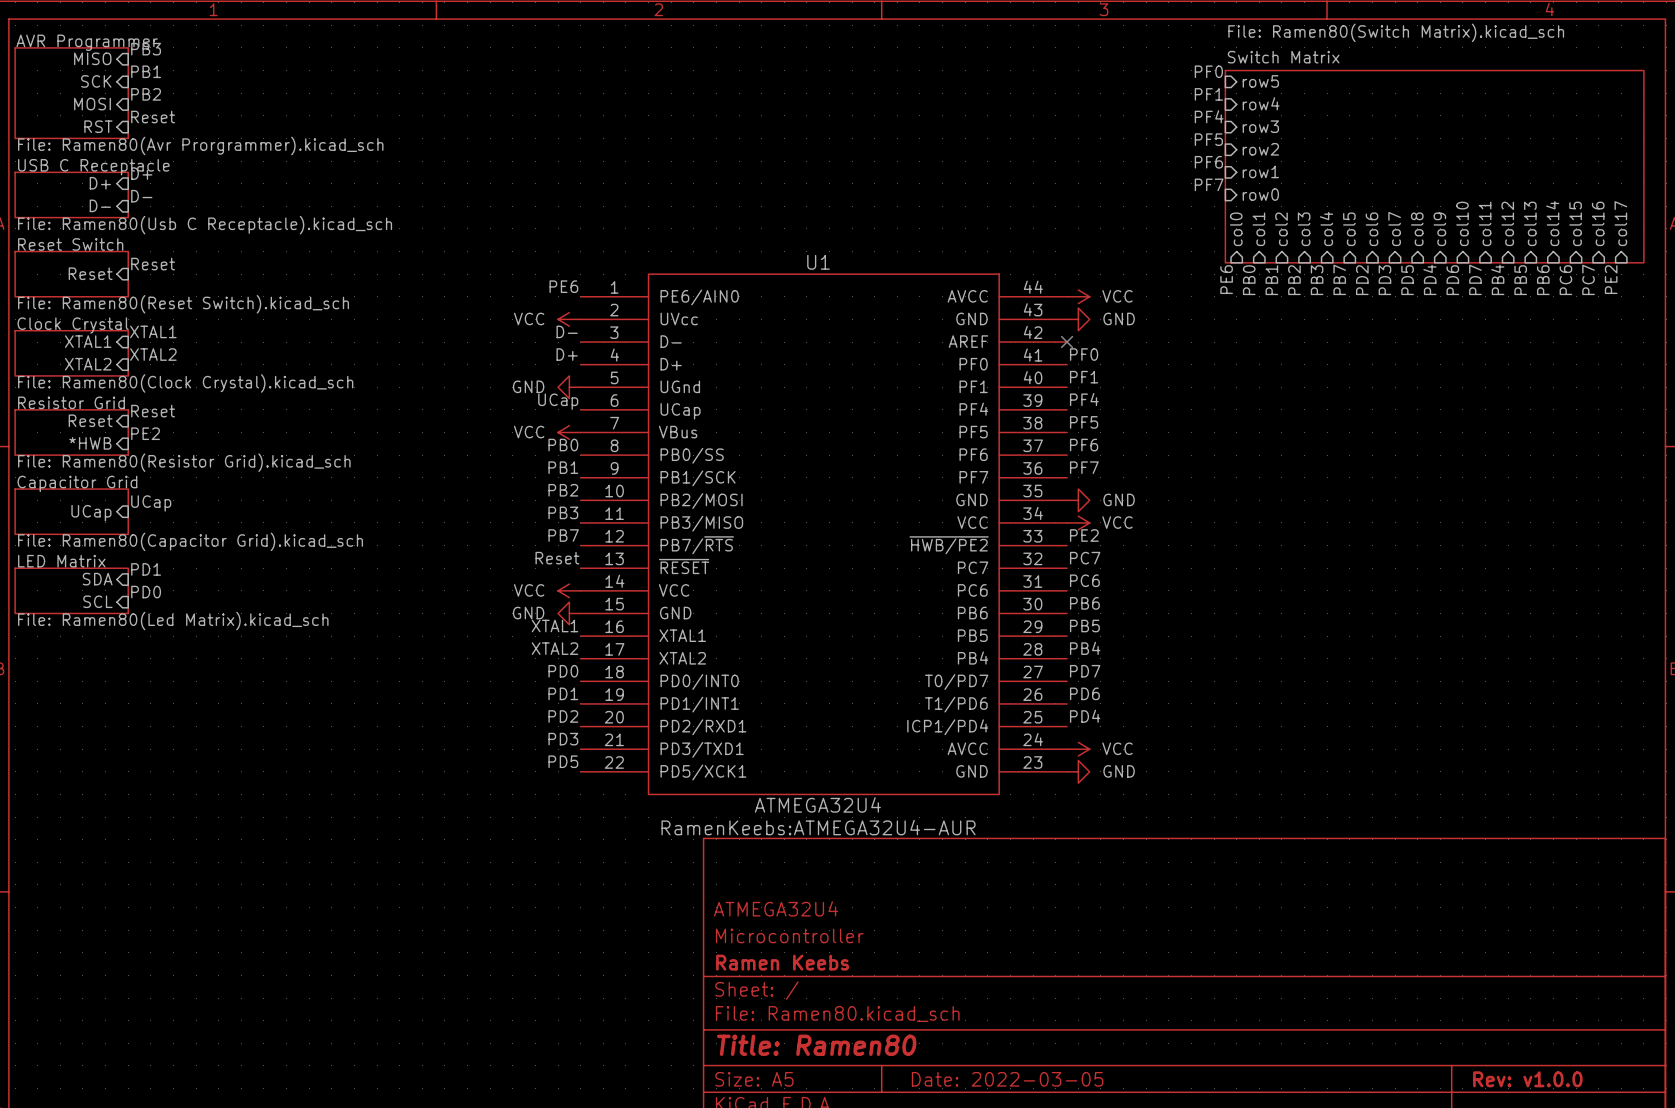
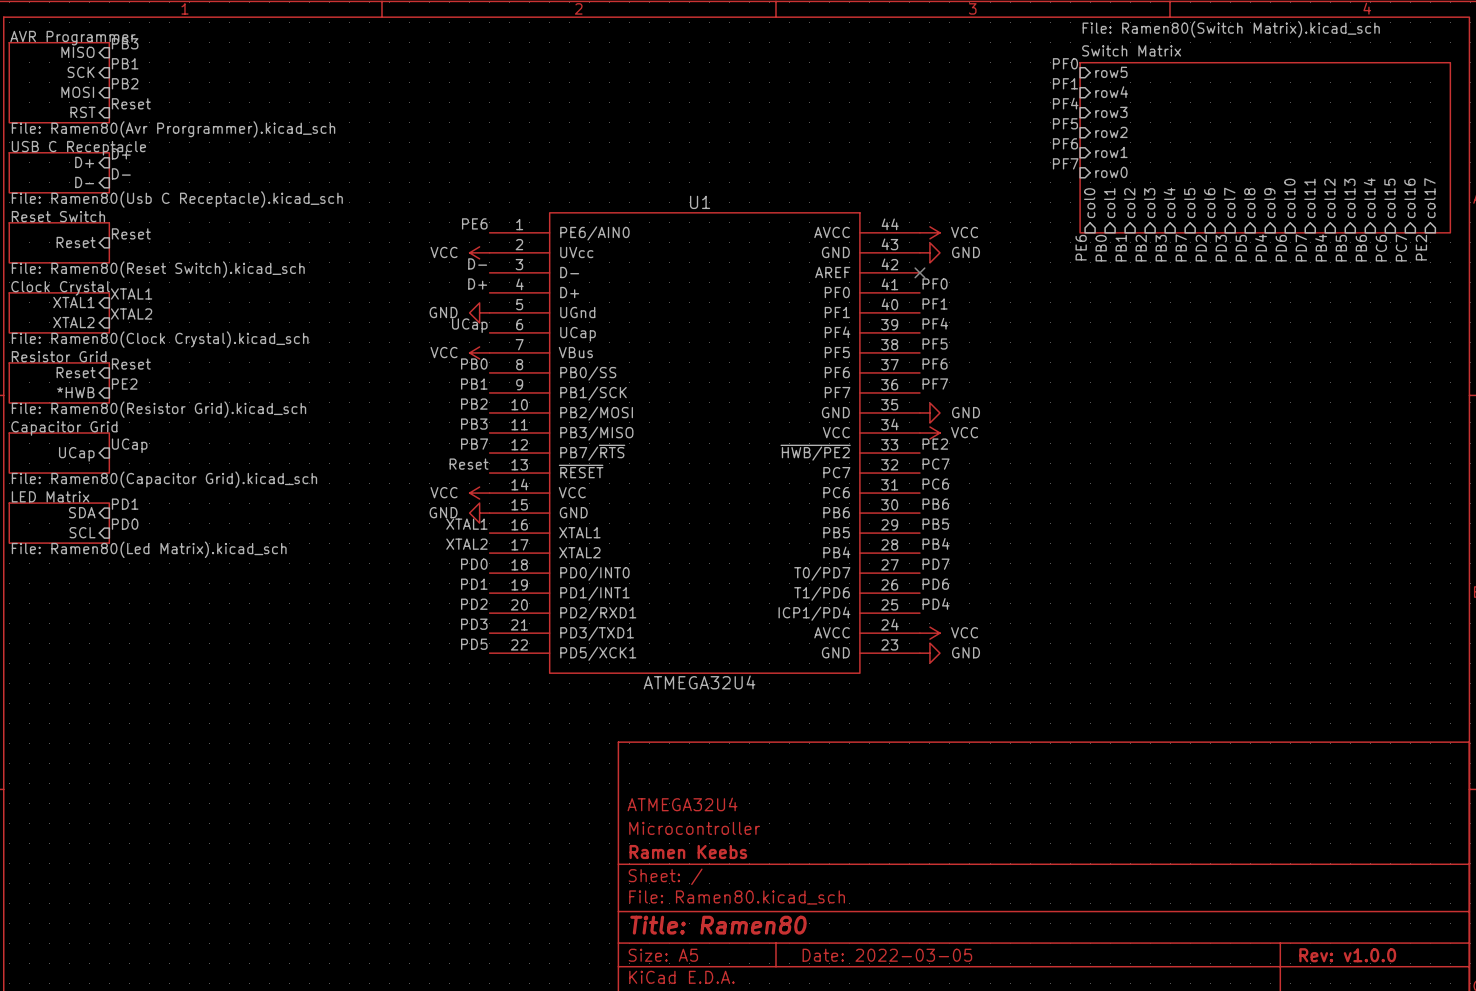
label position: PE6 (563, 286) -> PE6 (474, 223)
power symbol position: VCC (1078, 296) -> VCC (929, 232)
power symbol position: VCC (569, 319) -> VCC (479, 252)
power symbol position: GND (1078, 319) -> GND (929, 252)
label position: D- (567, 331) -> D- (477, 263)
no-connect mark position: (1067, 342) -> (919, 272)
label position: D+ (567, 354) -> D+ (477, 283)
label position: PF0 (1084, 354) -> PF0 (935, 283)
label position: PF1 (1084, 377) -> PF1 (935, 303)
power symbol position: GND (569, 387) -> GND (479, 312)
label position: PF4 (1084, 399) -> PF4 (935, 323)
label position: UCap (558, 401) -> UCap (469, 325)
label position: PF5 (1084, 422) -> PF5 (935, 344)
power symbol position: VCC (569, 432) -> VCC (479, 352)
label position: PB0 (563, 445) -> PB0 (474, 364)
label position: PF6 (1084, 445) -> PF6 (935, 364)
label position: PB1 (563, 467) -> PB1 (474, 384)
label position: PF7 (1084, 467) -> PF7 (935, 384)
label position: PB2 (563, 490) -> PB2 (474, 404)
power symbol position: GND (1078, 500) -> GND (929, 412)
label position: PB3 (563, 512) -> PB3 (474, 424)
power symbol position: VCC (1078, 522) -> VCC (929, 433)
U1 position: (823, 534) -> (704, 443)
label position: PB7 (563, 535) -> PB7 (474, 444)
label position: PE2 (1084, 535) -> PE2 (935, 444)
label position: Reset (557, 558) -> Reset (469, 464)
label position: PC7 (1085, 558) -> PC7 (935, 464)
label position: PC6 (1084, 580) -> PC6 (935, 484)
power symbol position: VCC (569, 590) -> VCC (479, 493)
label position: PB6 (1084, 603) -> PB6 (935, 504)
power symbol position: GND (569, 613) -> GND (479, 513)
label position: XTAL1 (554, 626) -> XTAL1 (466, 524)
label position: PB5 (1084, 626) -> PB5 (935, 524)
label position: XTAL2 (554, 648) -> XTAL2 (466, 544)
label position: PB4 (1085, 648) -> PB4 (935, 543)
label position: PD0 (563, 671) -> PD0 (474, 564)
label position: PD7 (1085, 671) -> PD7 (935, 564)
label position: PD1 (563, 693) -> PD1 (474, 584)
label position: PD6 (1084, 693) -> PD6 (935, 584)
label position: PD2 (563, 716) -> PD2 (474, 604)
label position: PD4 (1085, 716) -> PD4 (935, 603)
label position: PD3 (563, 739) -> PD3 (474, 624)
power symbol position: VCC (1078, 749) -> VCC (929, 633)
label position: PD5 (563, 761) -> PD5 (474, 644)
power symbol position: GND (1078, 771) -> GND (929, 653)
U1 text: RamenKeebs:ATMEGA32U4-AUR (818, 827) -> none

